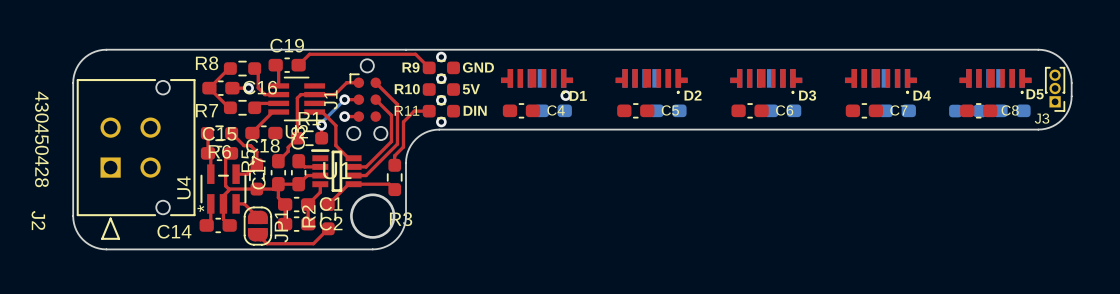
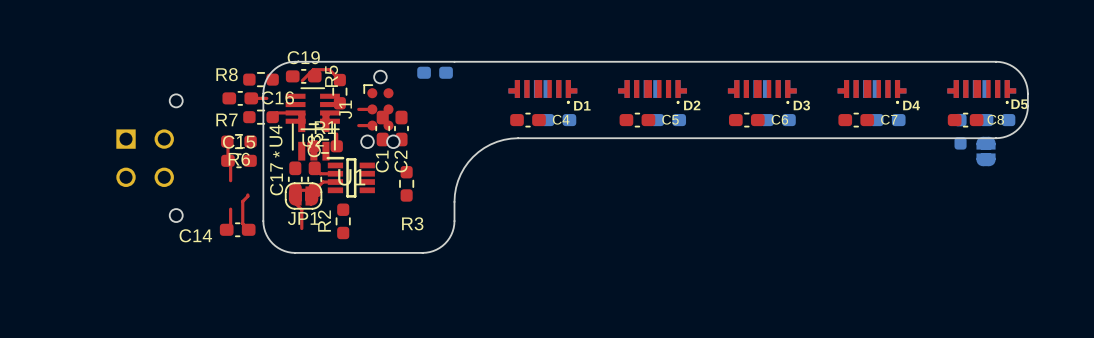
board edge: (106, 49) (1038, 49) (1052, 53) (1064, 62) (1070, 75) (1071, 96) (1068, 110) (1061, 119) (1049, 127) (1038, 129) (435, 129) (418, 136) (409, 148) (406, 162) (405, 223) (396, 239) (383, 247) (372, 249) (106, 249) (95, 247) (82, 239) (75, 227) (73, 216) (74, 75) (78, 65) (85, 56) (95, 51) (106, 49) -> (295, 61) (281, 64) (272, 71) (266, 79) (263, 93) (264, 228) (268, 238) (275, 245) (291, 252) (422, 252) (436, 249) (445, 243) (452, 231) (456, 187) (464, 168) (478, 152) (490, 144) (504, 139) (518, 138) (999, 138) (1009, 135) (1018, 128) (1024, 120) (1027, 109) (1027, 90) (1023, 76) (1013, 66) (999, 61) (295, 61)
via: (441, 57) -> none
top track: (275, 65) (278, 68) (278, 85) -> none
top track: (298, 65) (309, 54) (415, 54) (429, 67) -> none
top track: (254, 67) (258, 71) (258, 87) (264, 94) (278, 94) -> none
R9: (441, 67) -> none
text: GND (478, 67) -> none
top track: (230, 68) (209, 88) (230, 107) -> none
top track: none -> (339, 80) (329, 69) (313, 69) (302, 80)
via: (441, 78) -> none
top track: (358, 82) (346, 82) (334, 94) (300, 94) (297, 98) (297, 138) (278, 161) -> none
top track: (375, 82) (397, 104) (397, 144) (366, 175) (353, 175) -> none
via: (248, 88) -> none
R10: (441, 89) -> none
text: 5V (471, 89) -> none
J3: (1055, 89) -> none
via: (565, 95) -> none
bottom track: (344, 99) (321, 122) (321, 125) -> none
via: (344, 99) -> none
top track: (375, 99) (391, 115) (391, 141) (366, 166) (353, 166) -> none
via: (441, 100) -> none
text: DIN (475, 110) -> none
top track: (429, 111) (414, 111) (403, 121) (403, 147) (394, 155) (394, 165) -> none
R11: (441, 111) -> none
part rotation: 0° (967, 111) -> 90° clockwise (960, 131)
top track: (278, 112) (272, 112) (252, 133) -> none
top track: (314, 112) (322, 112) (335, 125) (335, 145) (348, 158) (353, 158) -> none
via: (344, 116) -> none
via: (441, 121) -> none
via: (321, 125) -> none
top track: (231, 133) (244, 145) (250, 145) (256, 151) (256, 164) (247, 174) (236, 174) -> none
C18 side: top (263, 133) -> bottom (435, 72)
part: none -> (986, 151)
top track: (231, 153) (225, 153) (225, 185) (228, 189) (273, 189) (278, 184) -> none
J2 side: top (136, 159) -> bottom (149, 158)
R5 position: (256, 176) -> (339, 91)
top track: (320, 184) (320, 192) (308, 204) (308, 224) -> none
U4 position: (223, 189) -> (313, 136)
top track: (394, 189) (389, 184) (348, 184) (328, 204) -> none
round board edge: [350, 193, 396, 239] -> none
top track: (236, 203) (244, 203) (257, 217) -> none
C1 rotation: 0° (296, 204) -> 90° clockwise (382, 128)
C1 position: (296, 204) -> (382, 128)
U4 text position: * (200, 208) -> * (276, 154)
C2 rotation: 0° (296, 224) -> 90° clockwise (401, 128)
C2 position: (296, 224) -> (401, 128)
JP1 rotation: 0° (257, 226) -> 90° clockwise (303, 196)
JP1 position: (257, 226) -> (303, 196)
top track: (328, 228) (313, 243) (266, 243) (257, 234) -> none

